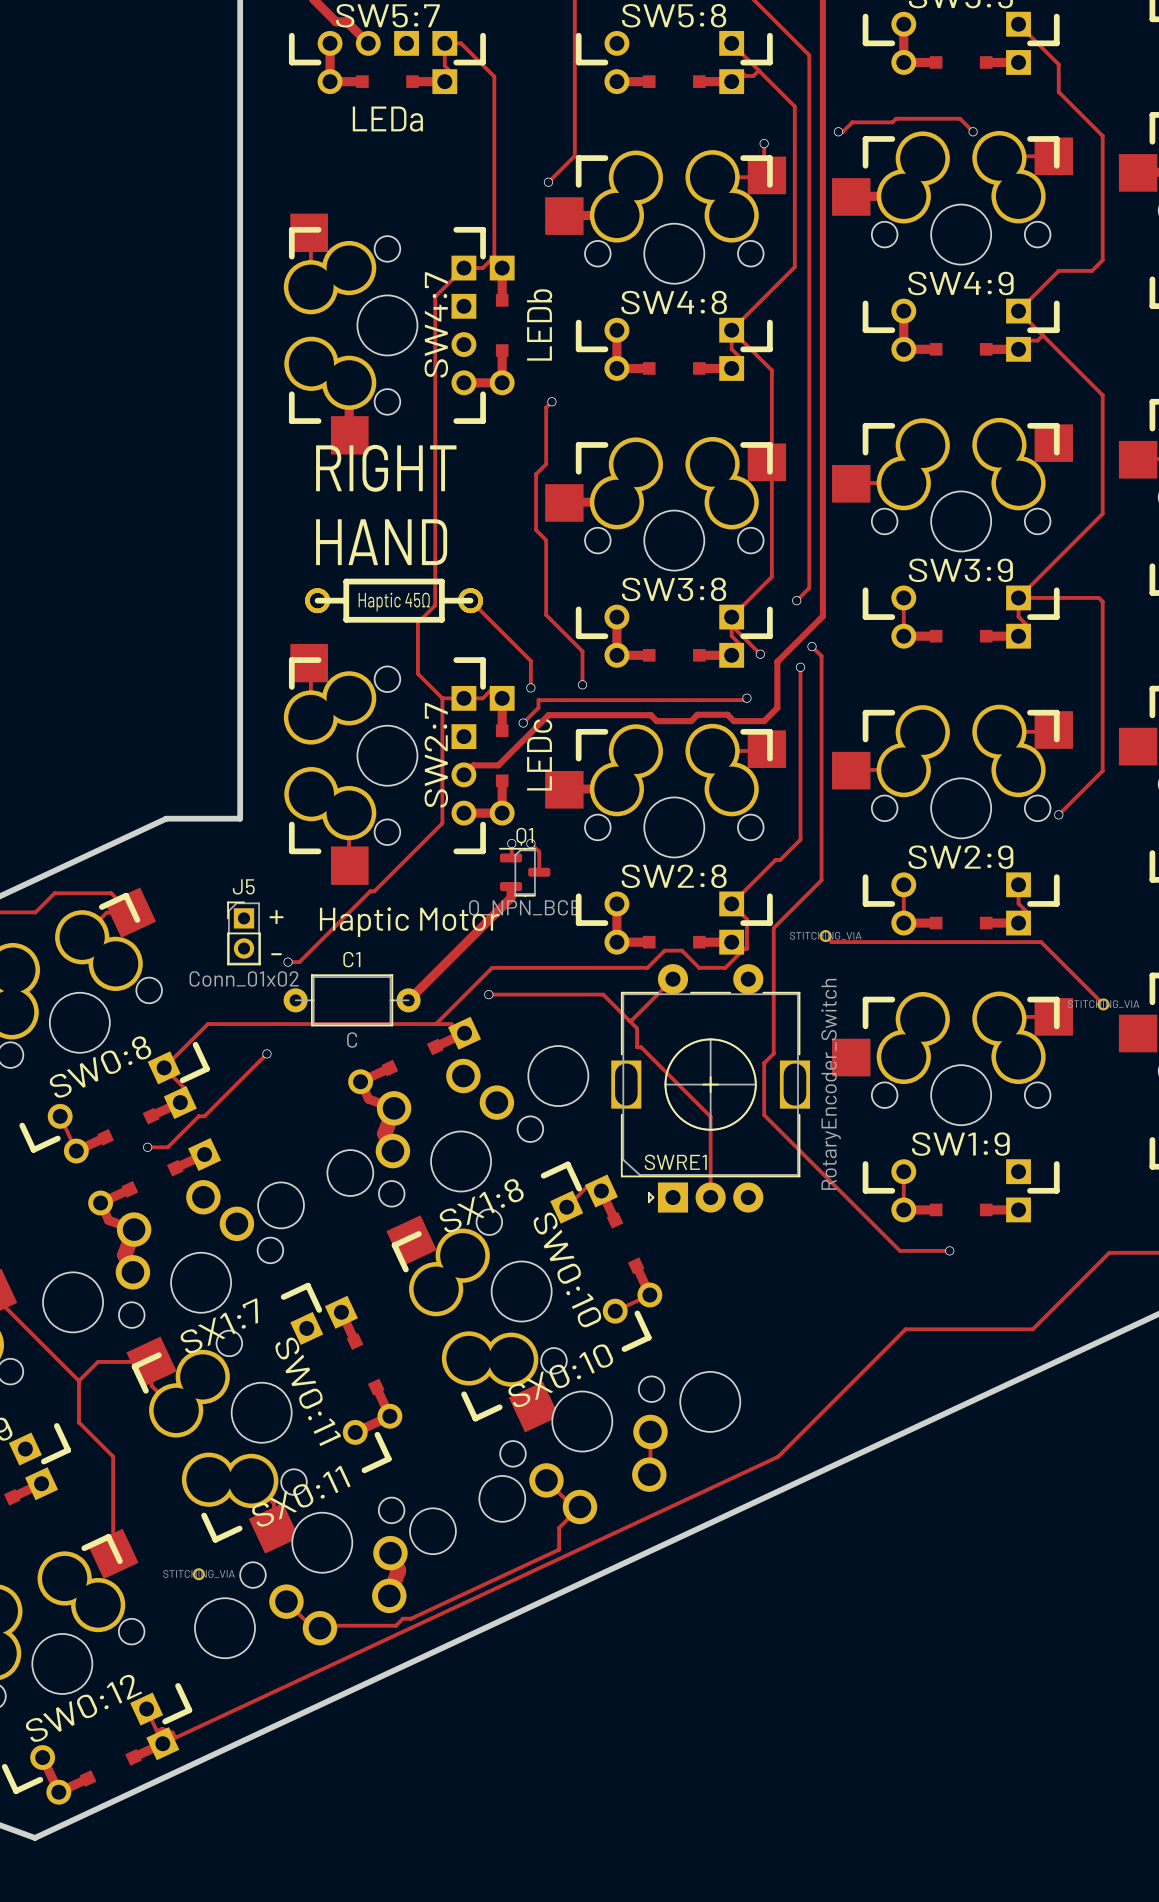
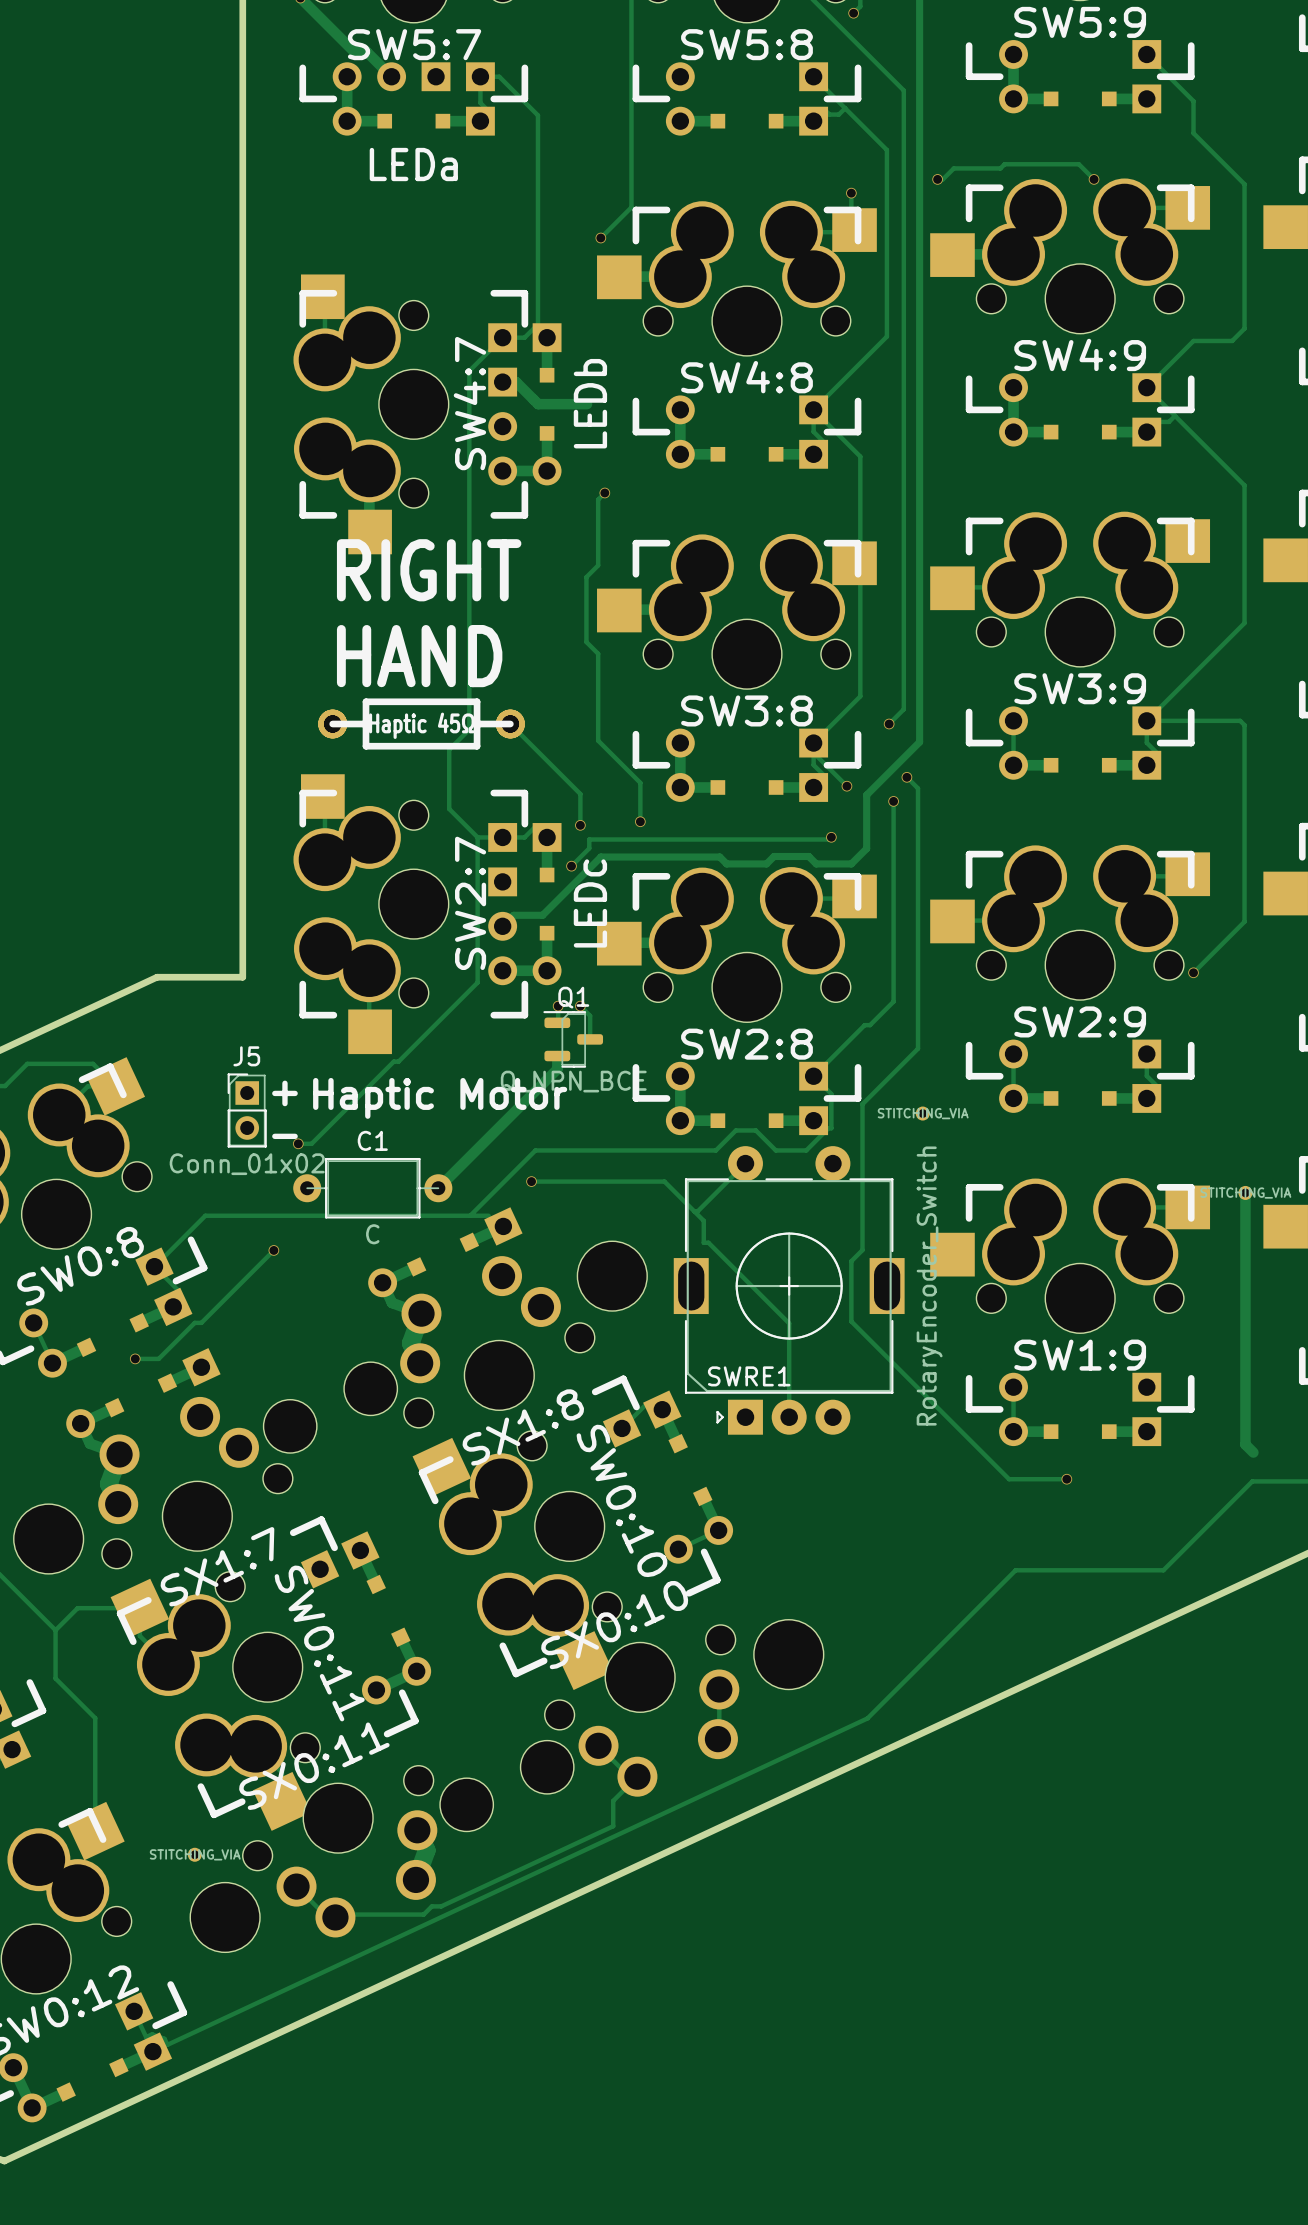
track: none -> (502, 382) (516, 382) (538, 404) (587, 404)
track: (825, 936) (831, 942) (1041, 942) (1103, 1004) -> (1253, 1452) (1245, 1444) (1245, 1192)

